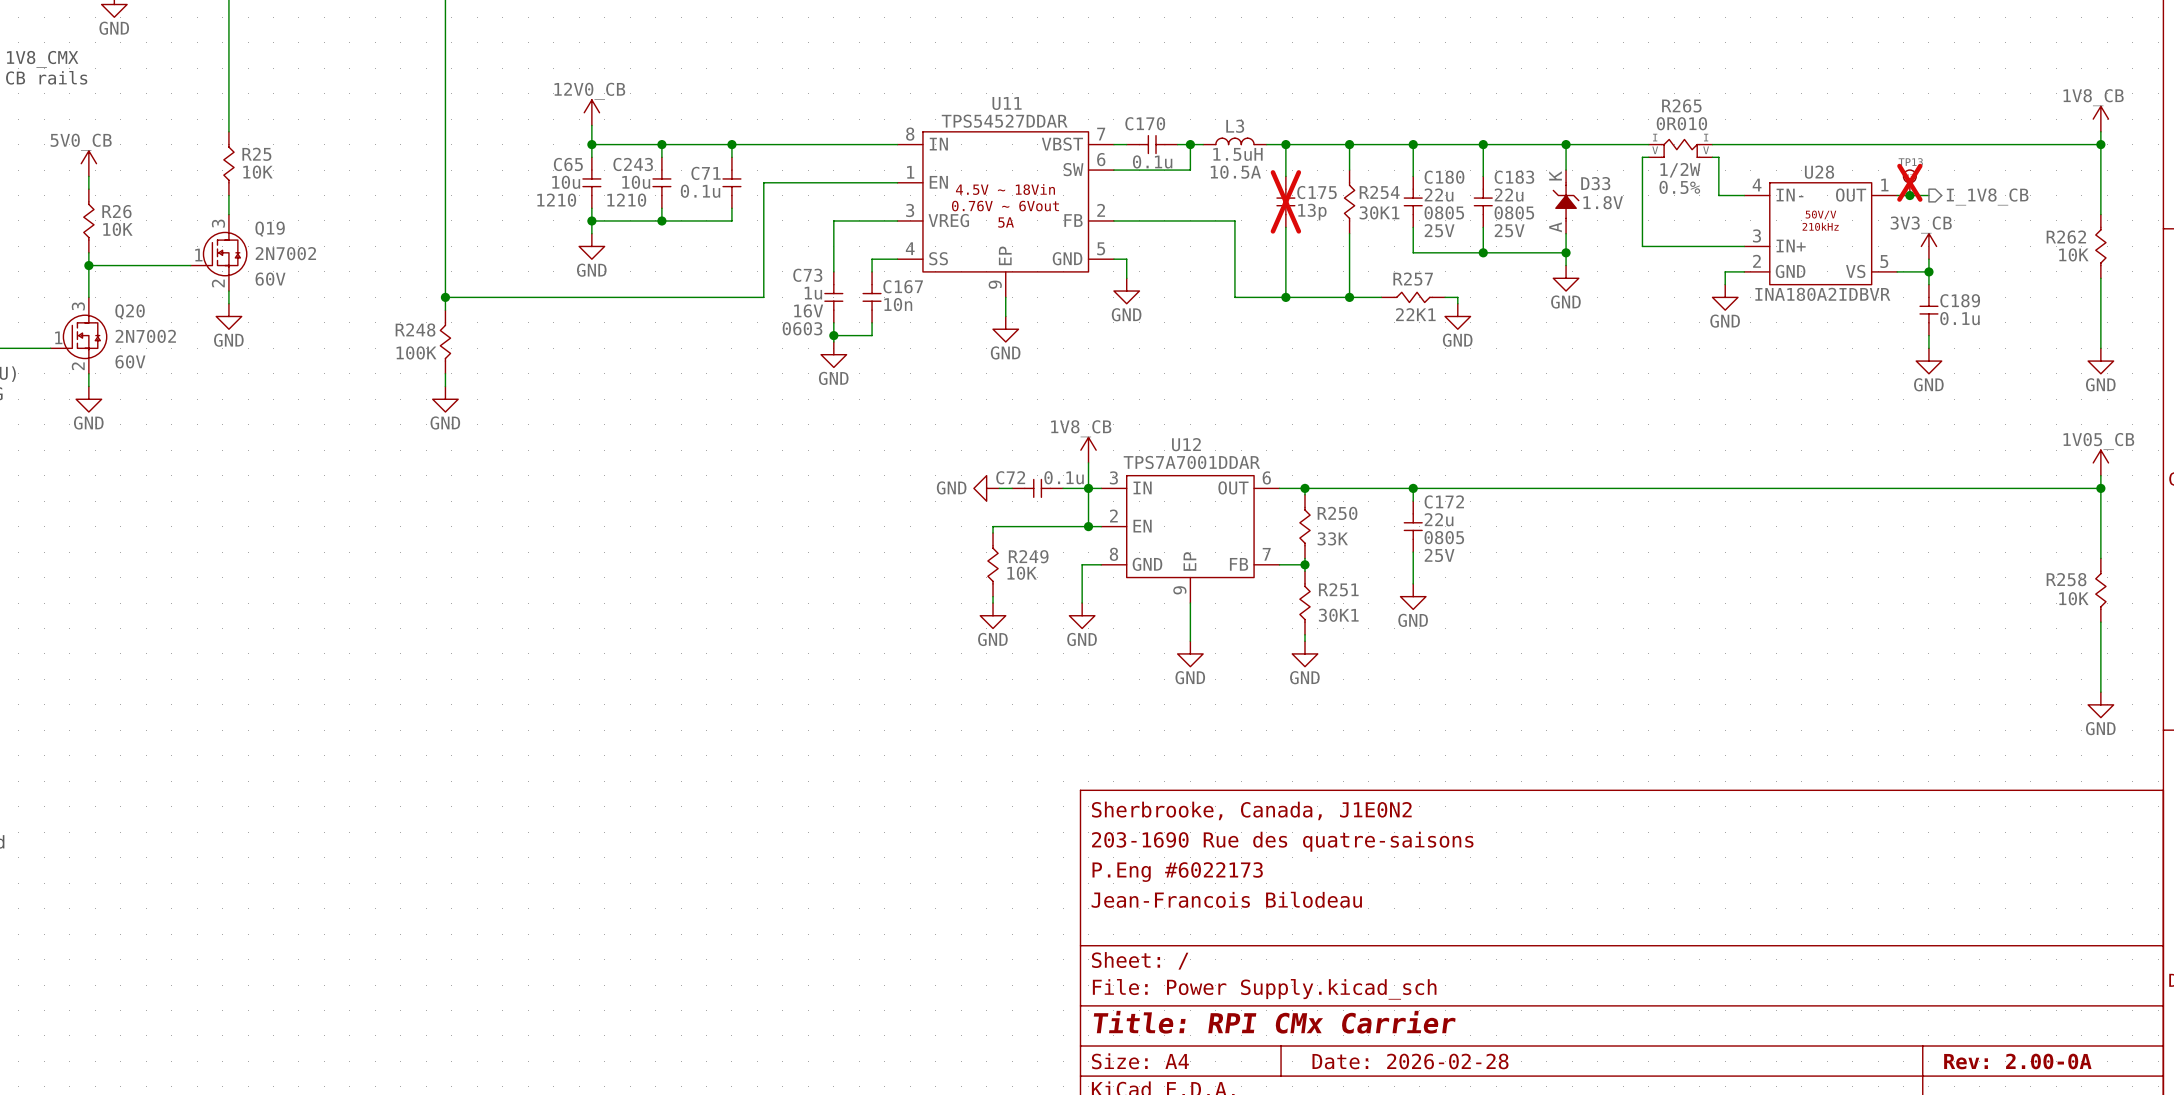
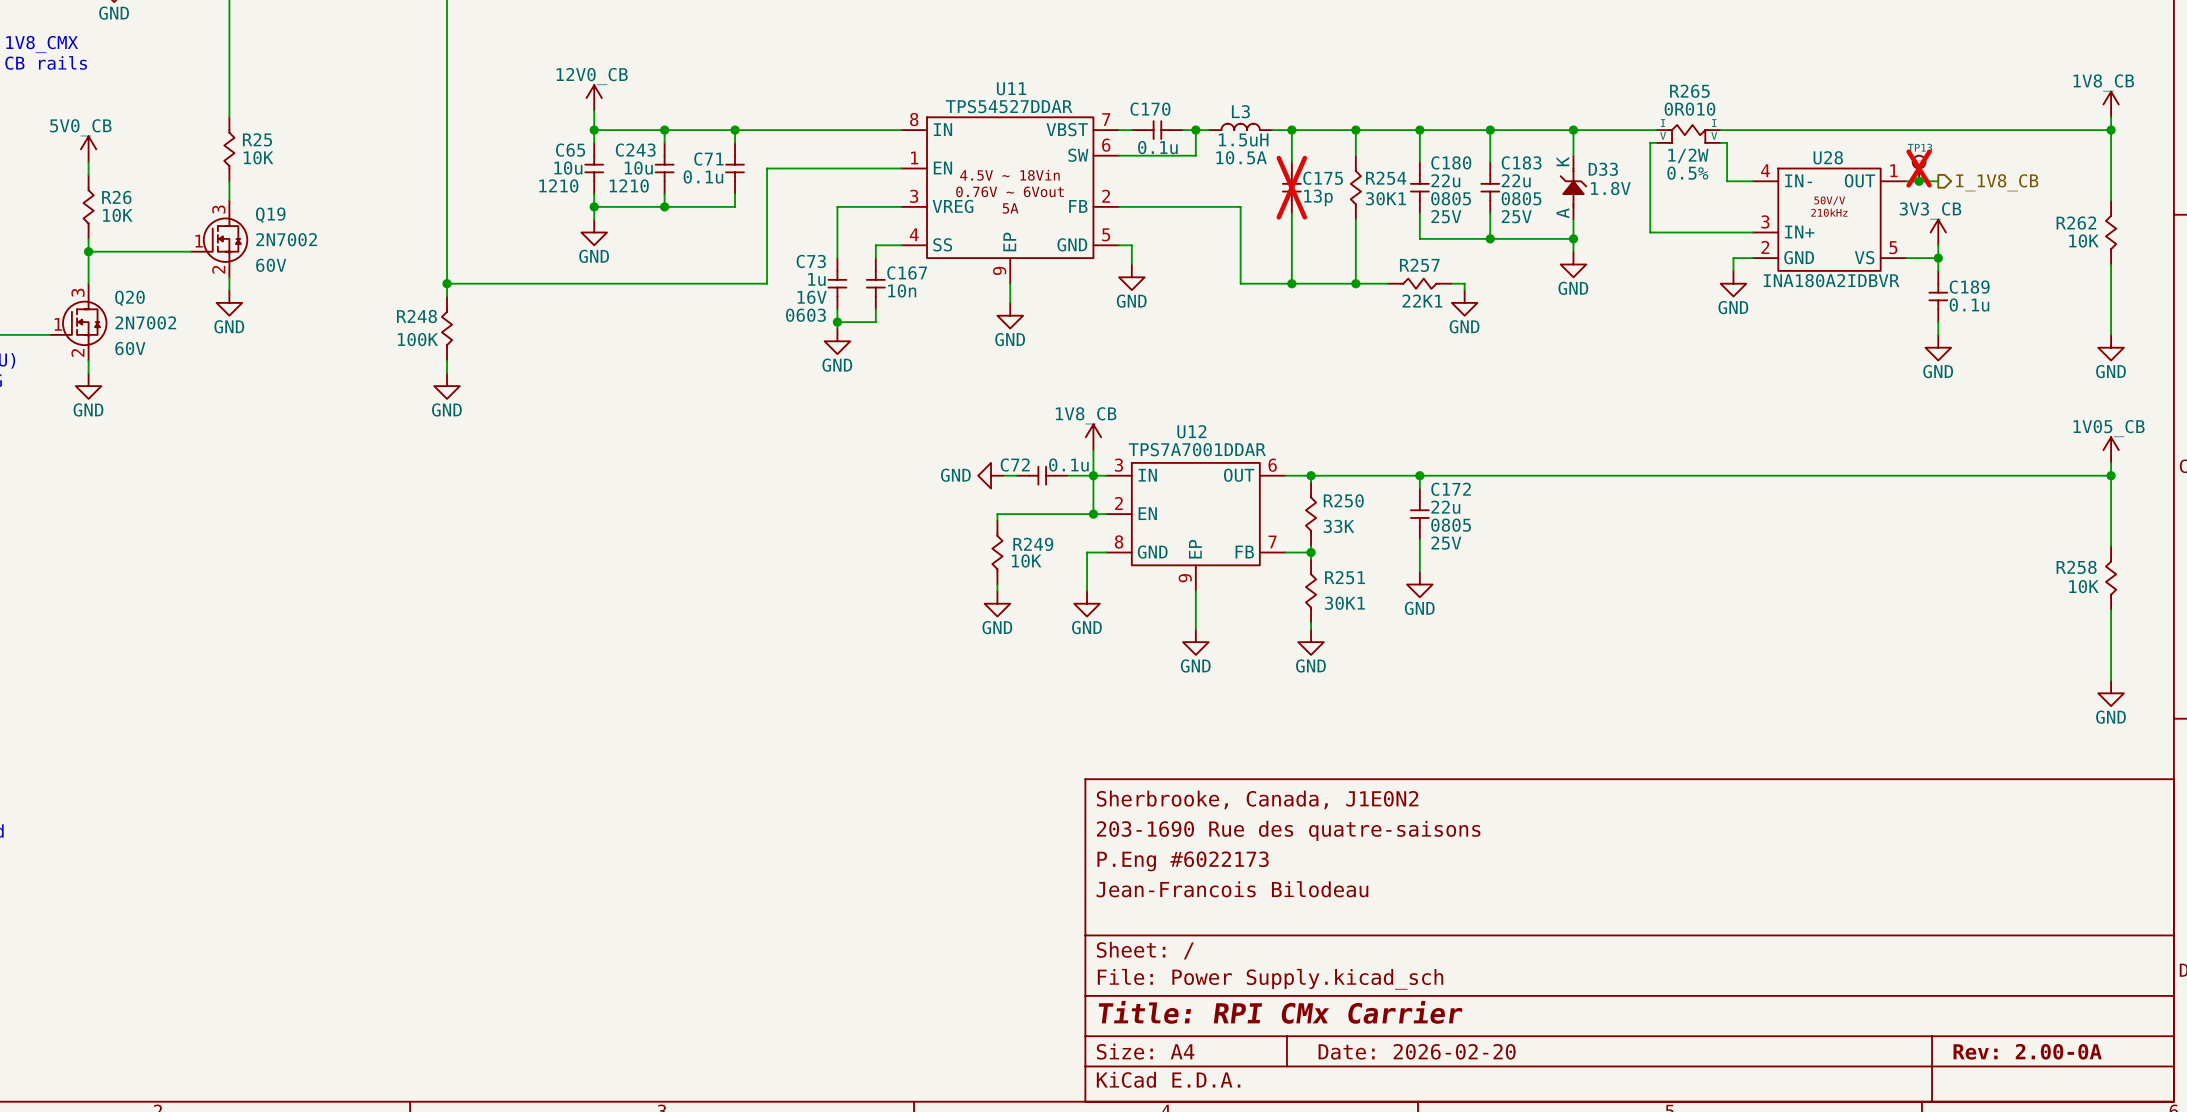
title block: Date: 2026-02-28 (1410, 1061) -> Date: 2026-02-20 (1417, 1051)

